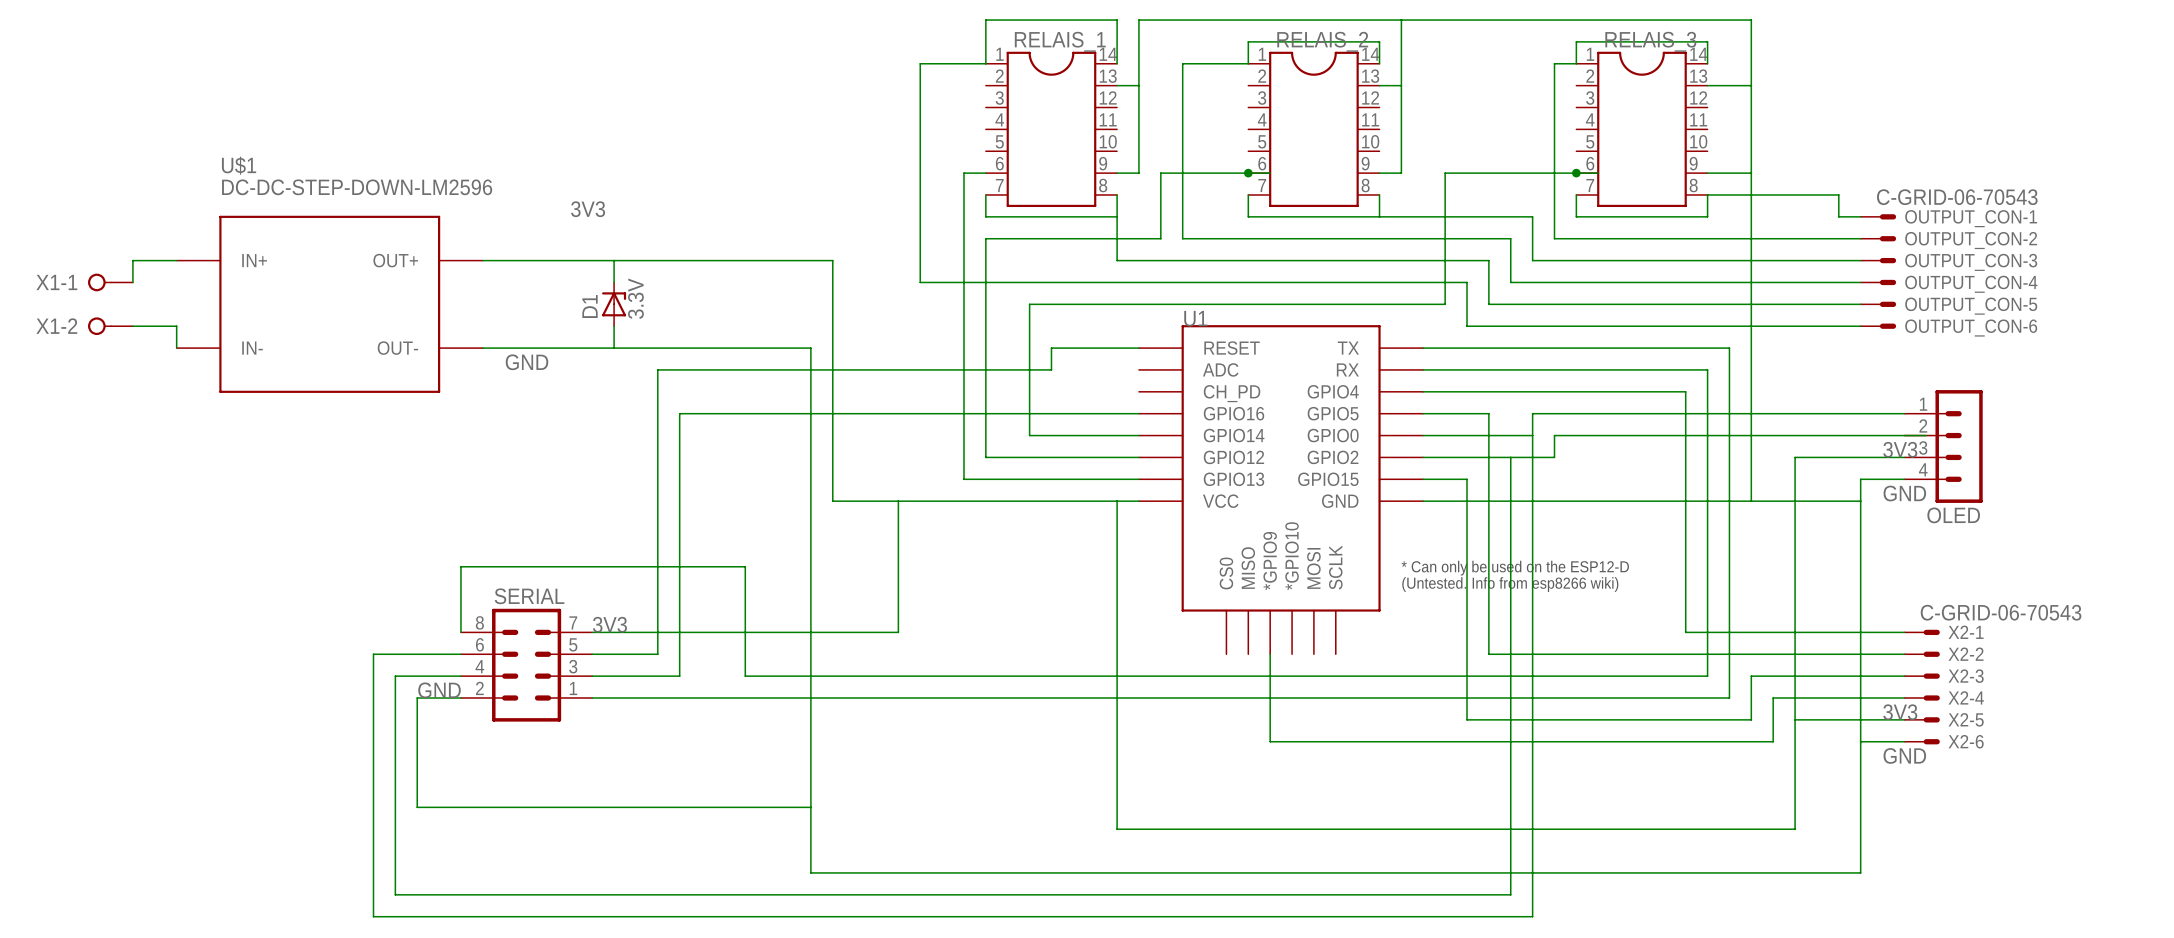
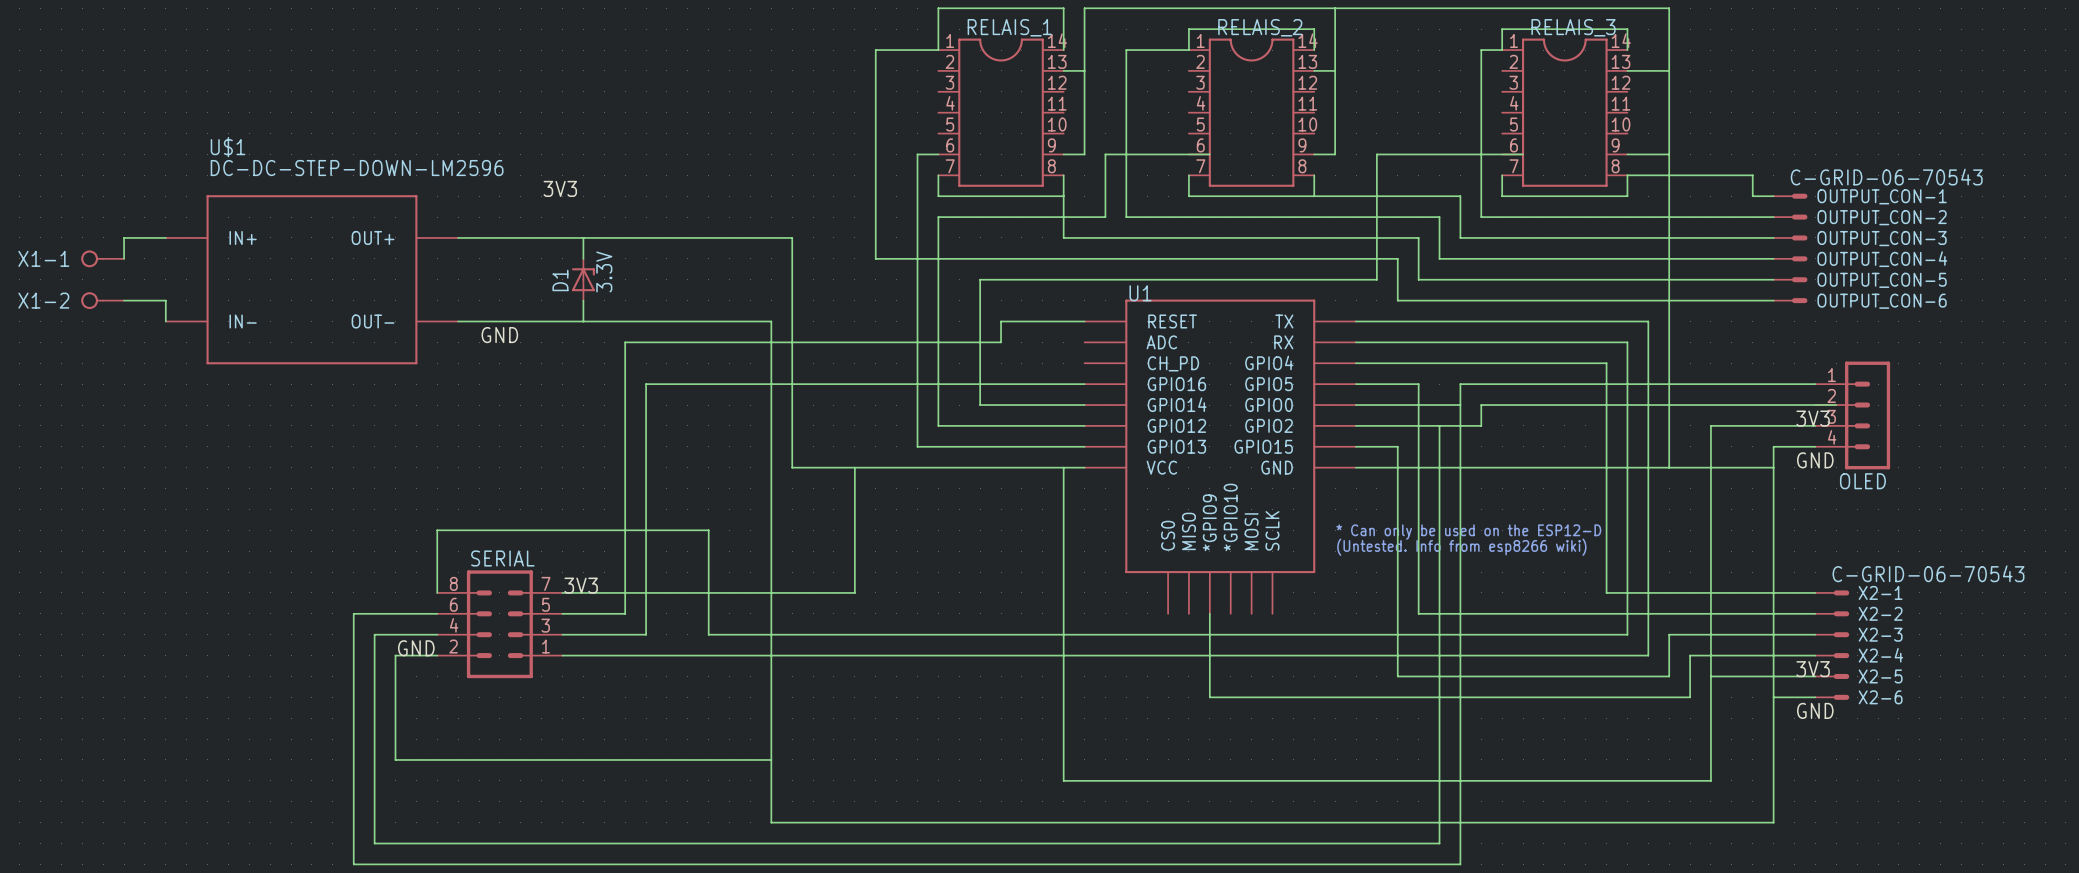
junction: (1248, 173) -> none
junction: (1576, 173) -> none

